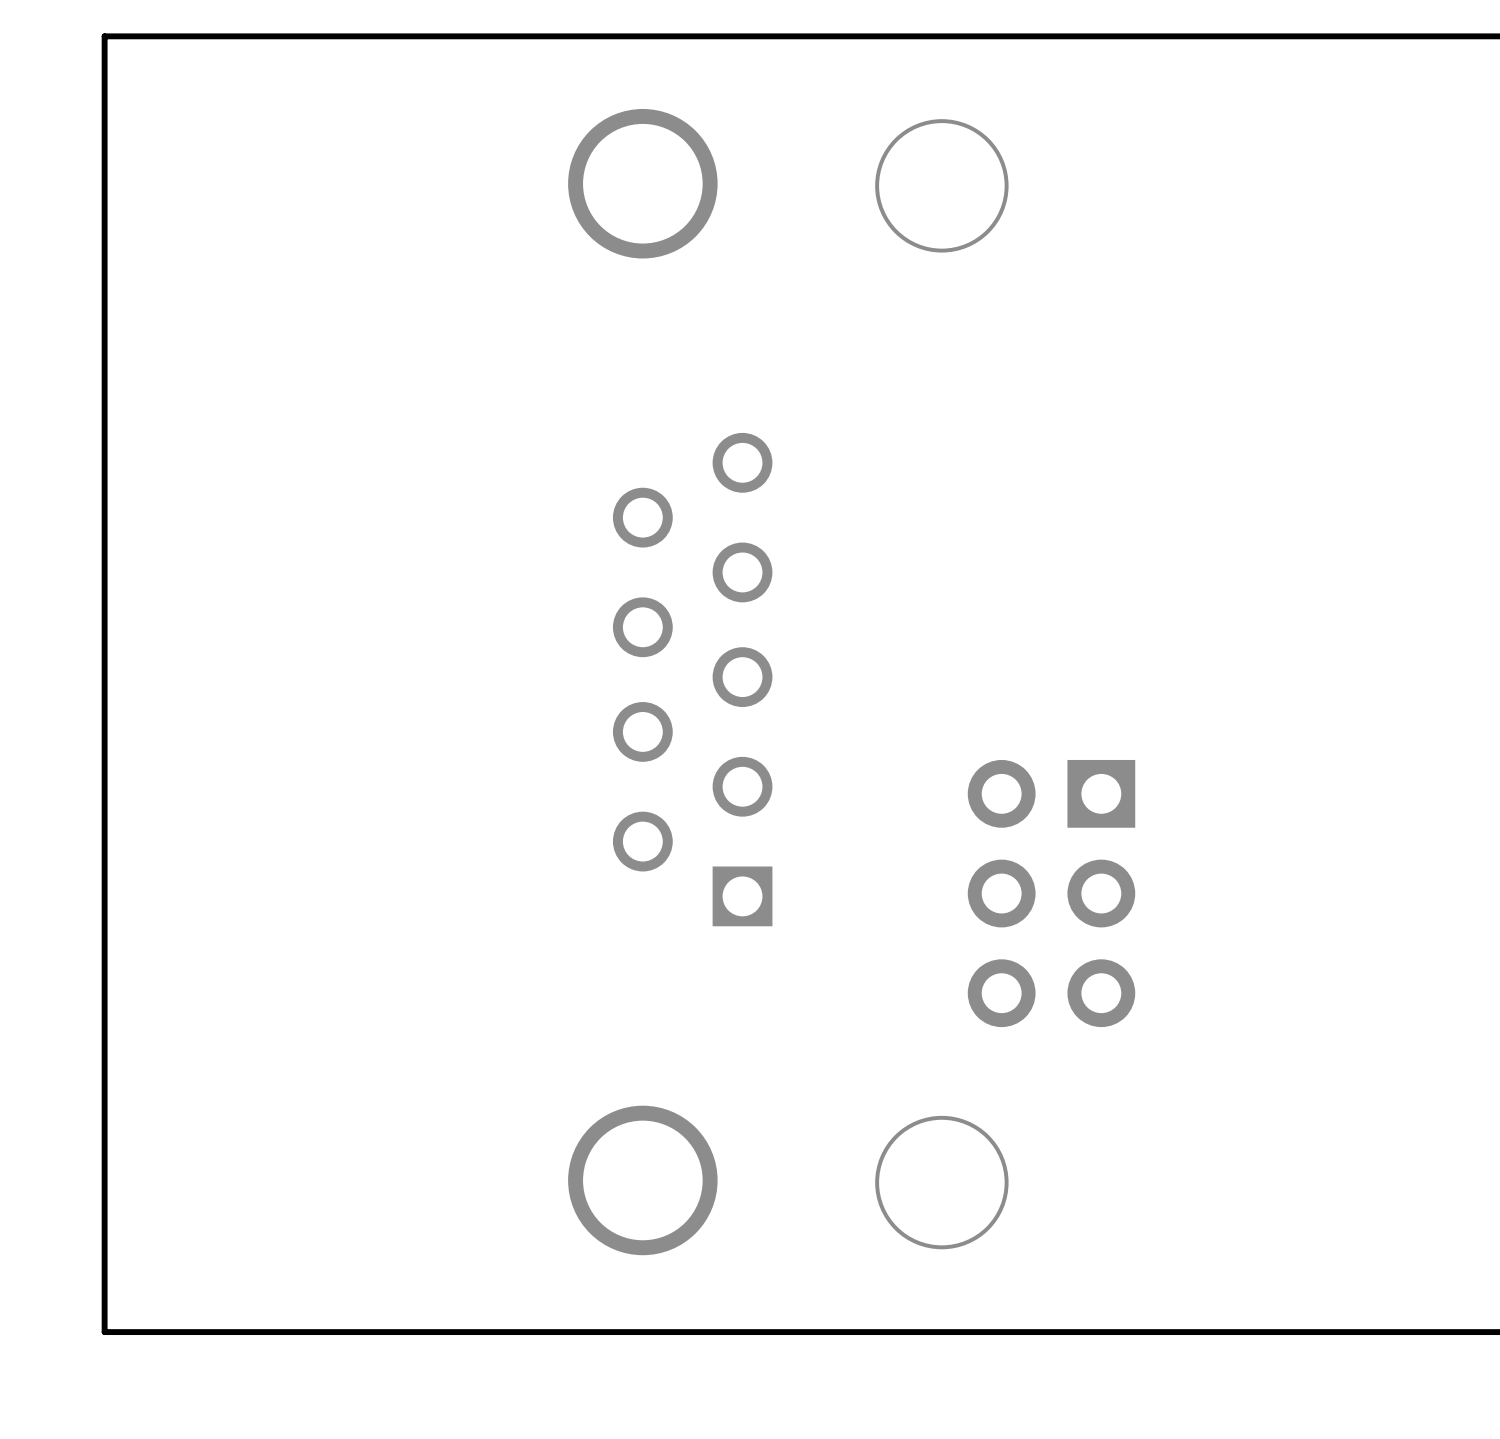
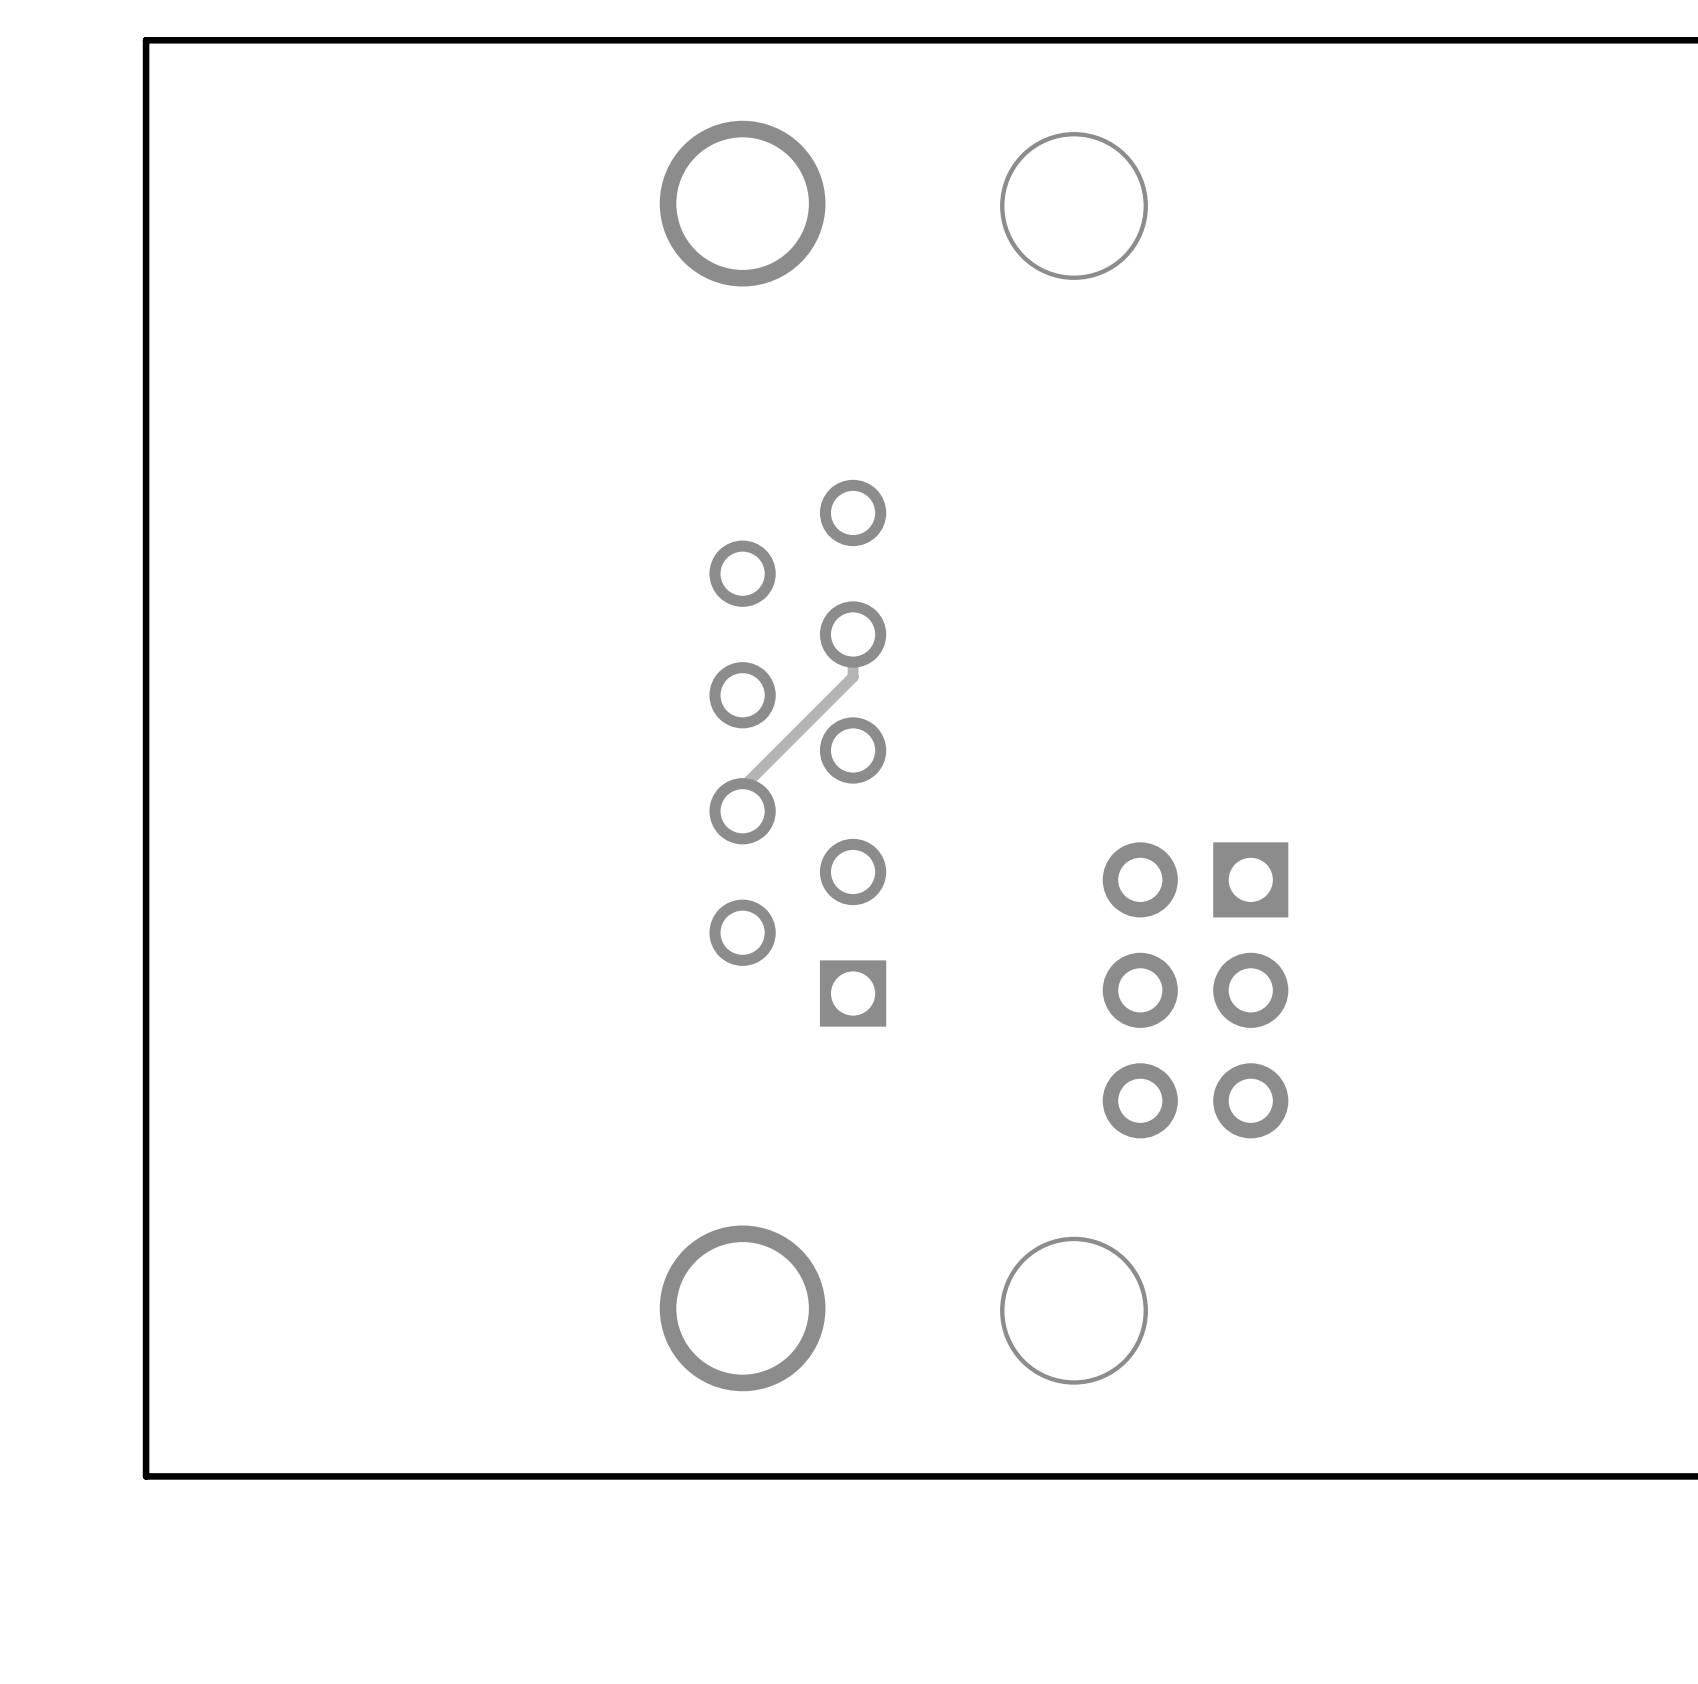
track: none -> (853, 634) (853, 677) (742, 787) (742, 811)

